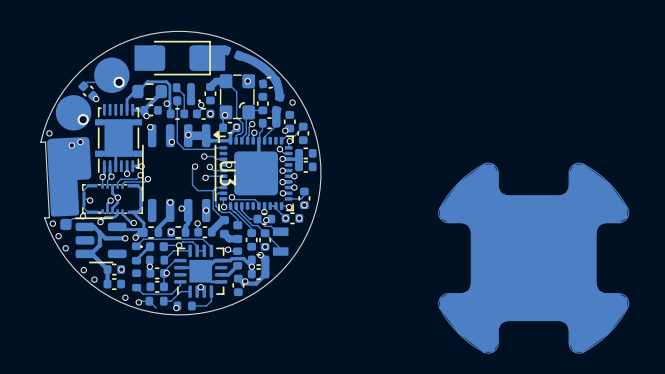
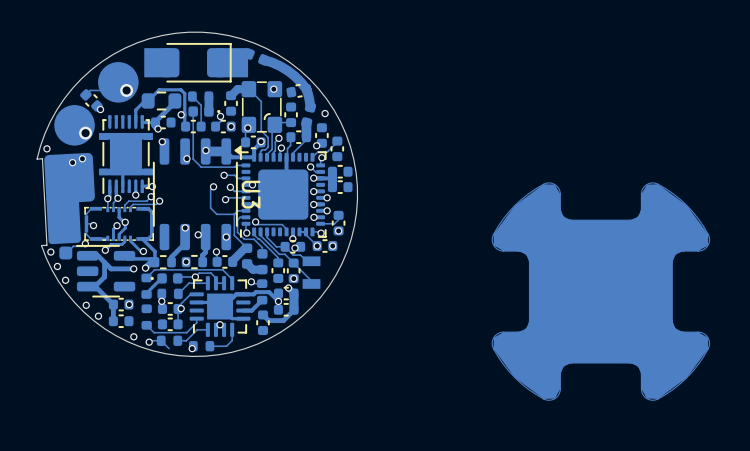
via: (245, 281) -> none

